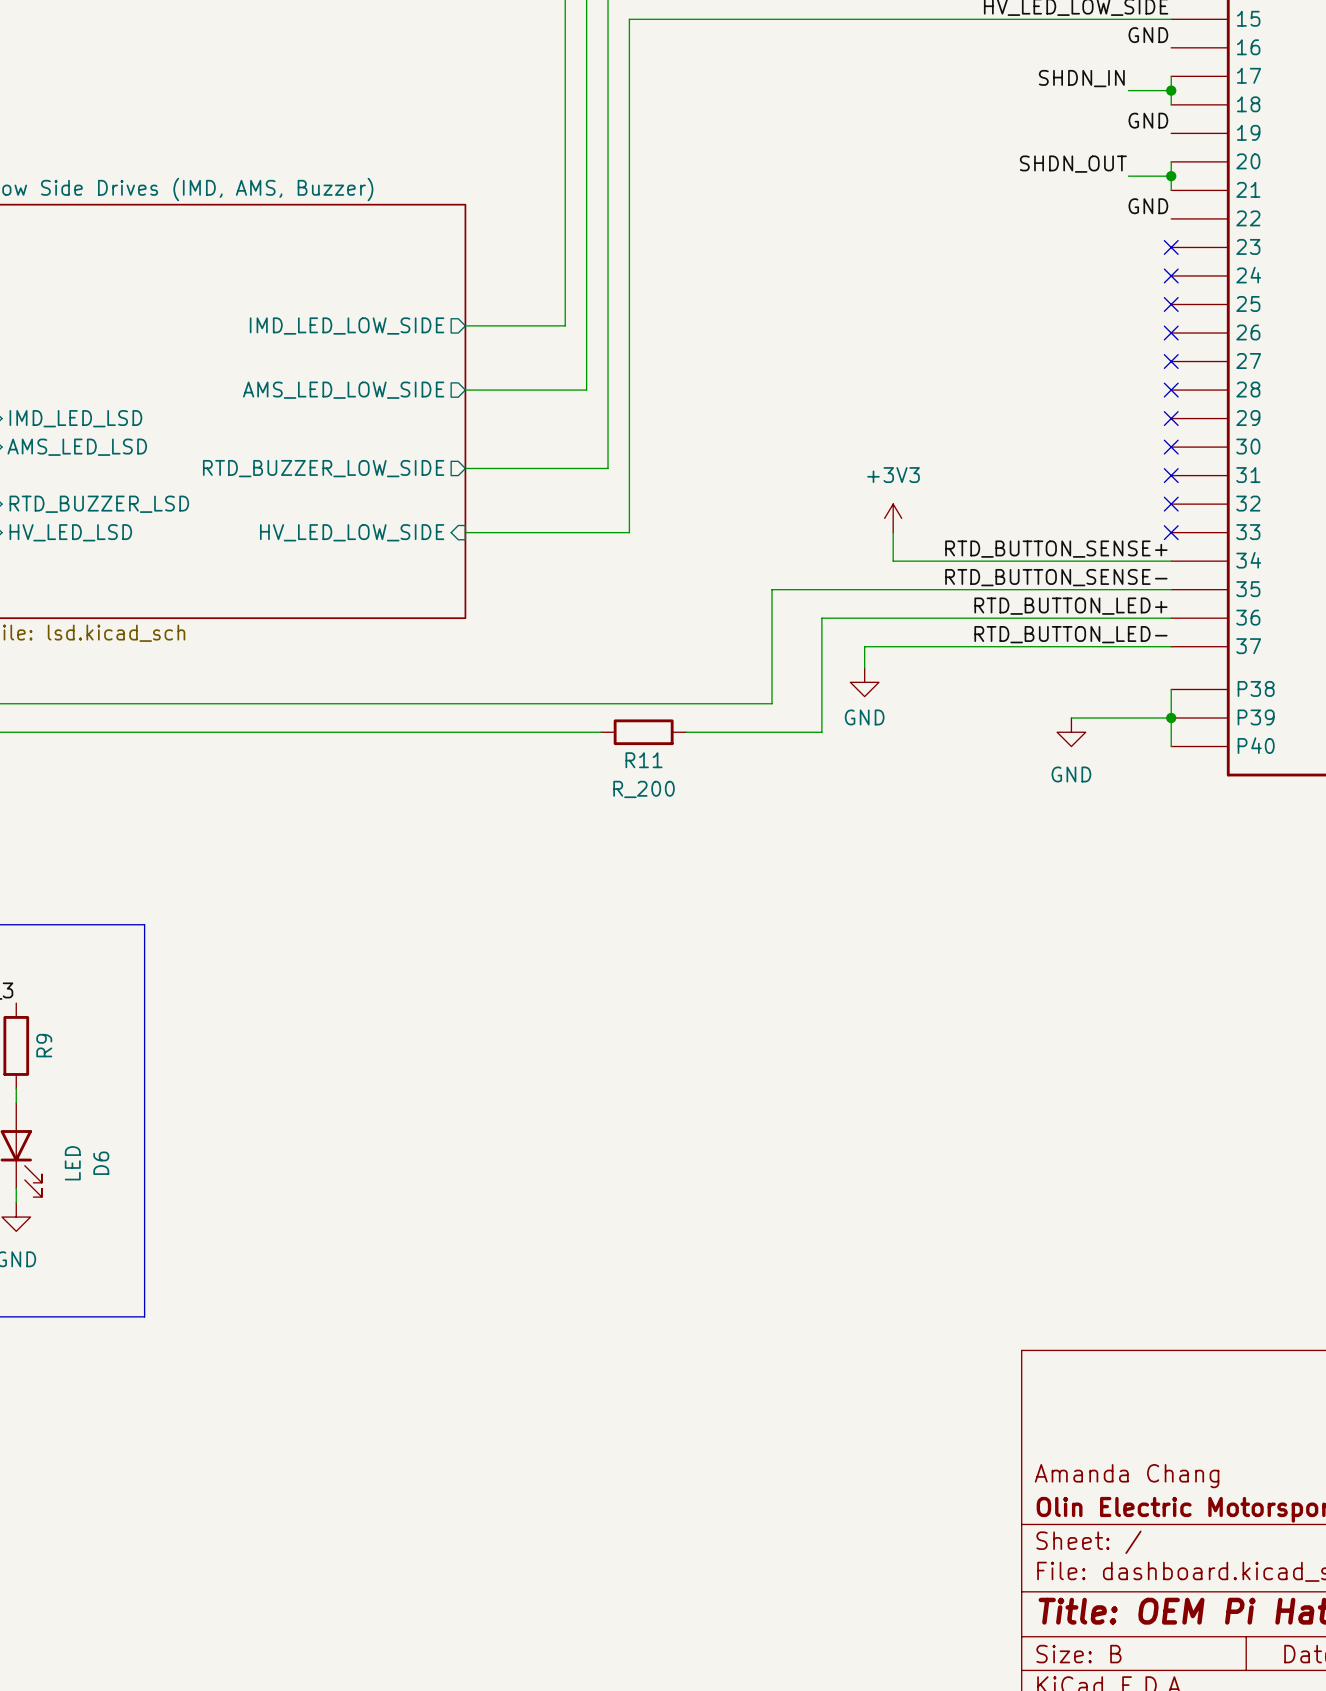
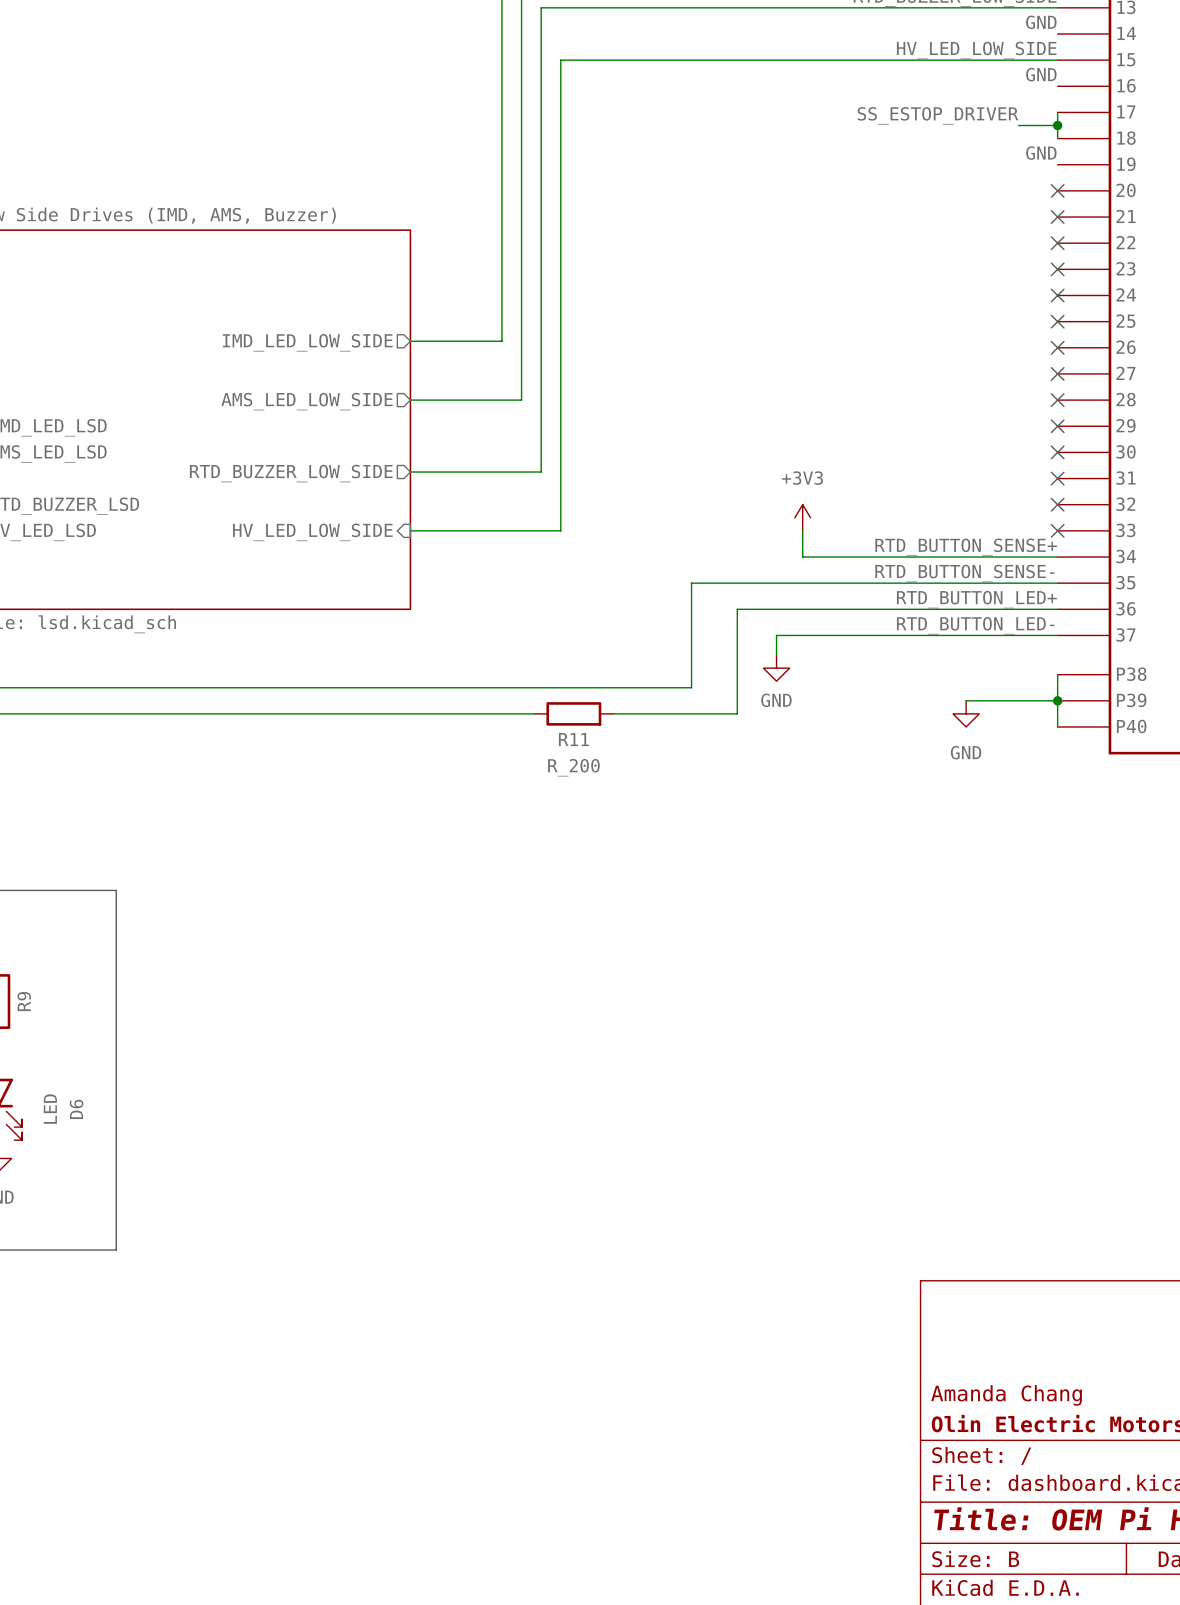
label: SHDN_IN (1081, 78) -> SS_ESTOP_DRIVER (938, 115)
wire: (1171, 161) (1171, 190) -> none
no-connect mark: none -> (1057, 190)
label: SHDN_OUT (1073, 164) -> none
wire: (1128, 176) (1171, 176) -> none
junction: (1171, 176) -> none
no-connect mark: none -> (1057, 217)
label: GND (1148, 206) -> none
no-connect mark: none -> (1057, 243)

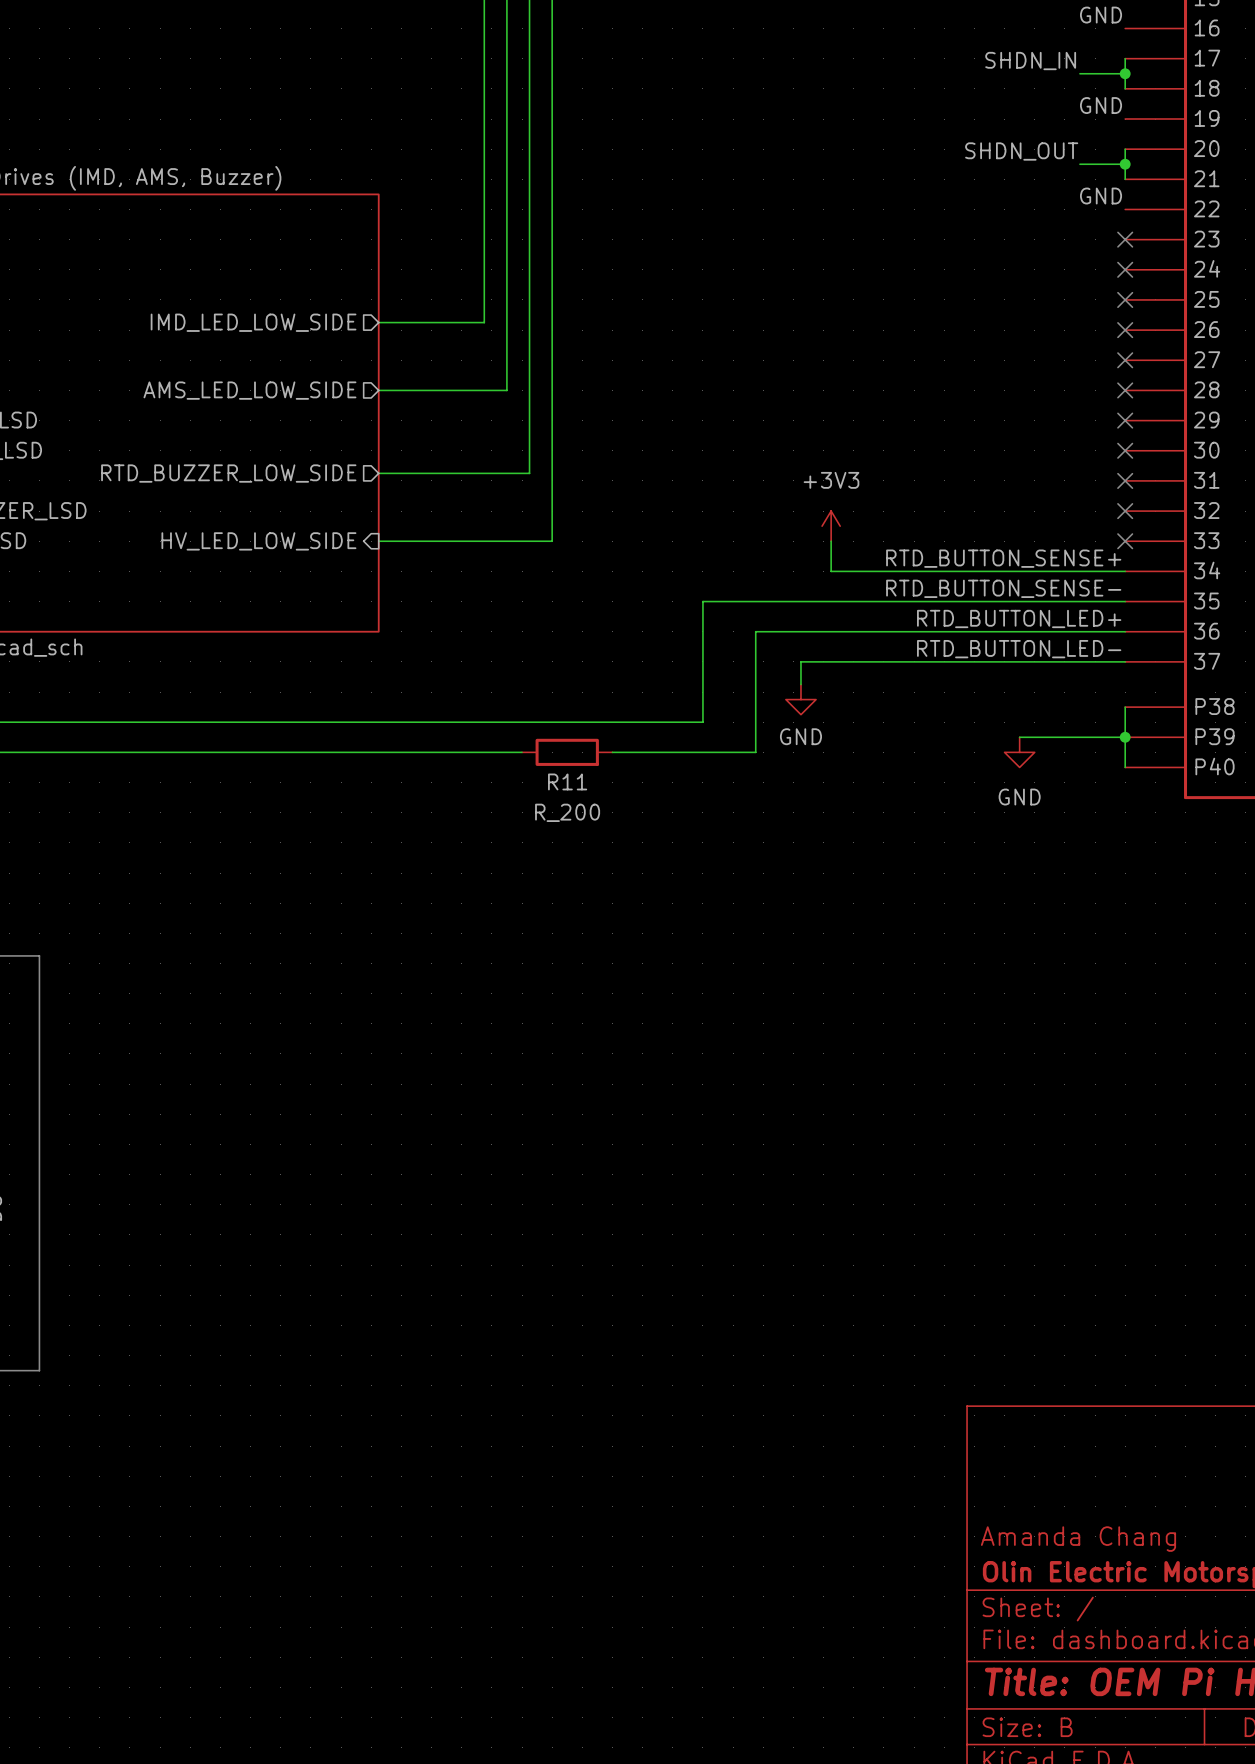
label: SS_ESTOP_DRIVER (938, 115) -> SHDN_IN (1030, 61)
wire: none -> (1125, 149) (1125, 179)
no-connect mark: (1057, 190) -> none
label: none -> SHDN_OUT (1021, 151)
wire: none -> (1079, 164) (1125, 164)
junction: none -> (1125, 164)
no-connect mark: (1057, 217) -> none
label: none -> GND (1101, 196)
no-connect mark: (1057, 243) -> none

